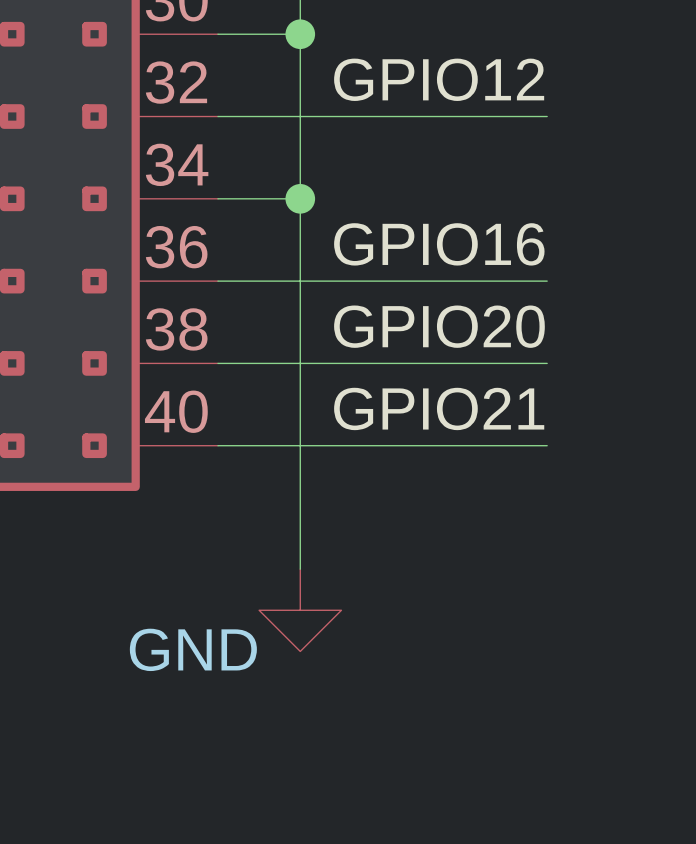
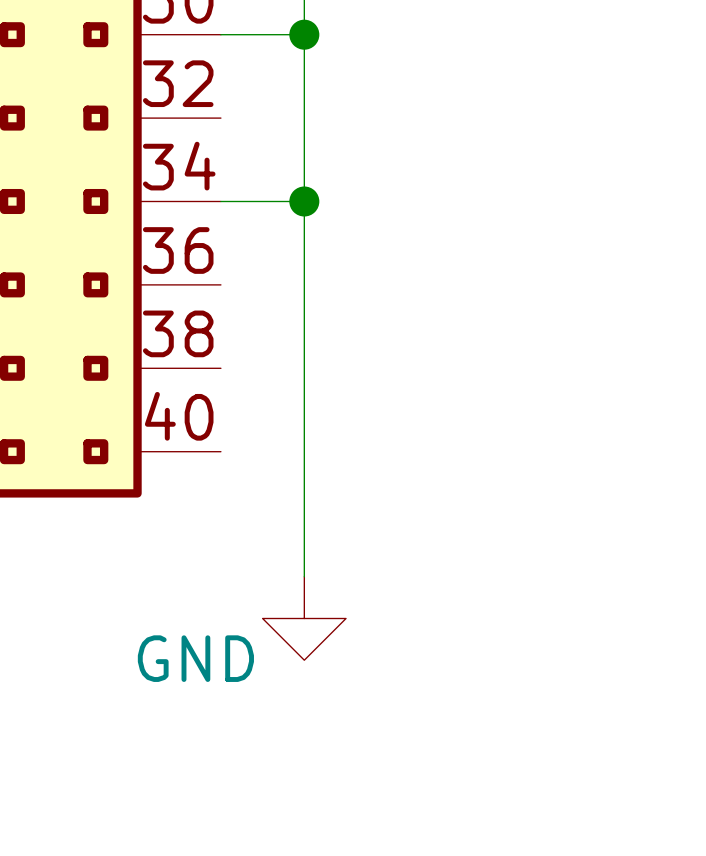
label: GPIO12 (439, 79) -> none
wire: (217, 116) (547, 116) -> none
label: GPIO16 (439, 244) -> none
wire: (217, 281) (547, 281) -> none
label: GPIO20 (439, 326) -> none
wire: (217, 363) (547, 363) -> none
label: GPIO21 (439, 408) -> none
wire: (217, 445) (547, 445) -> none

